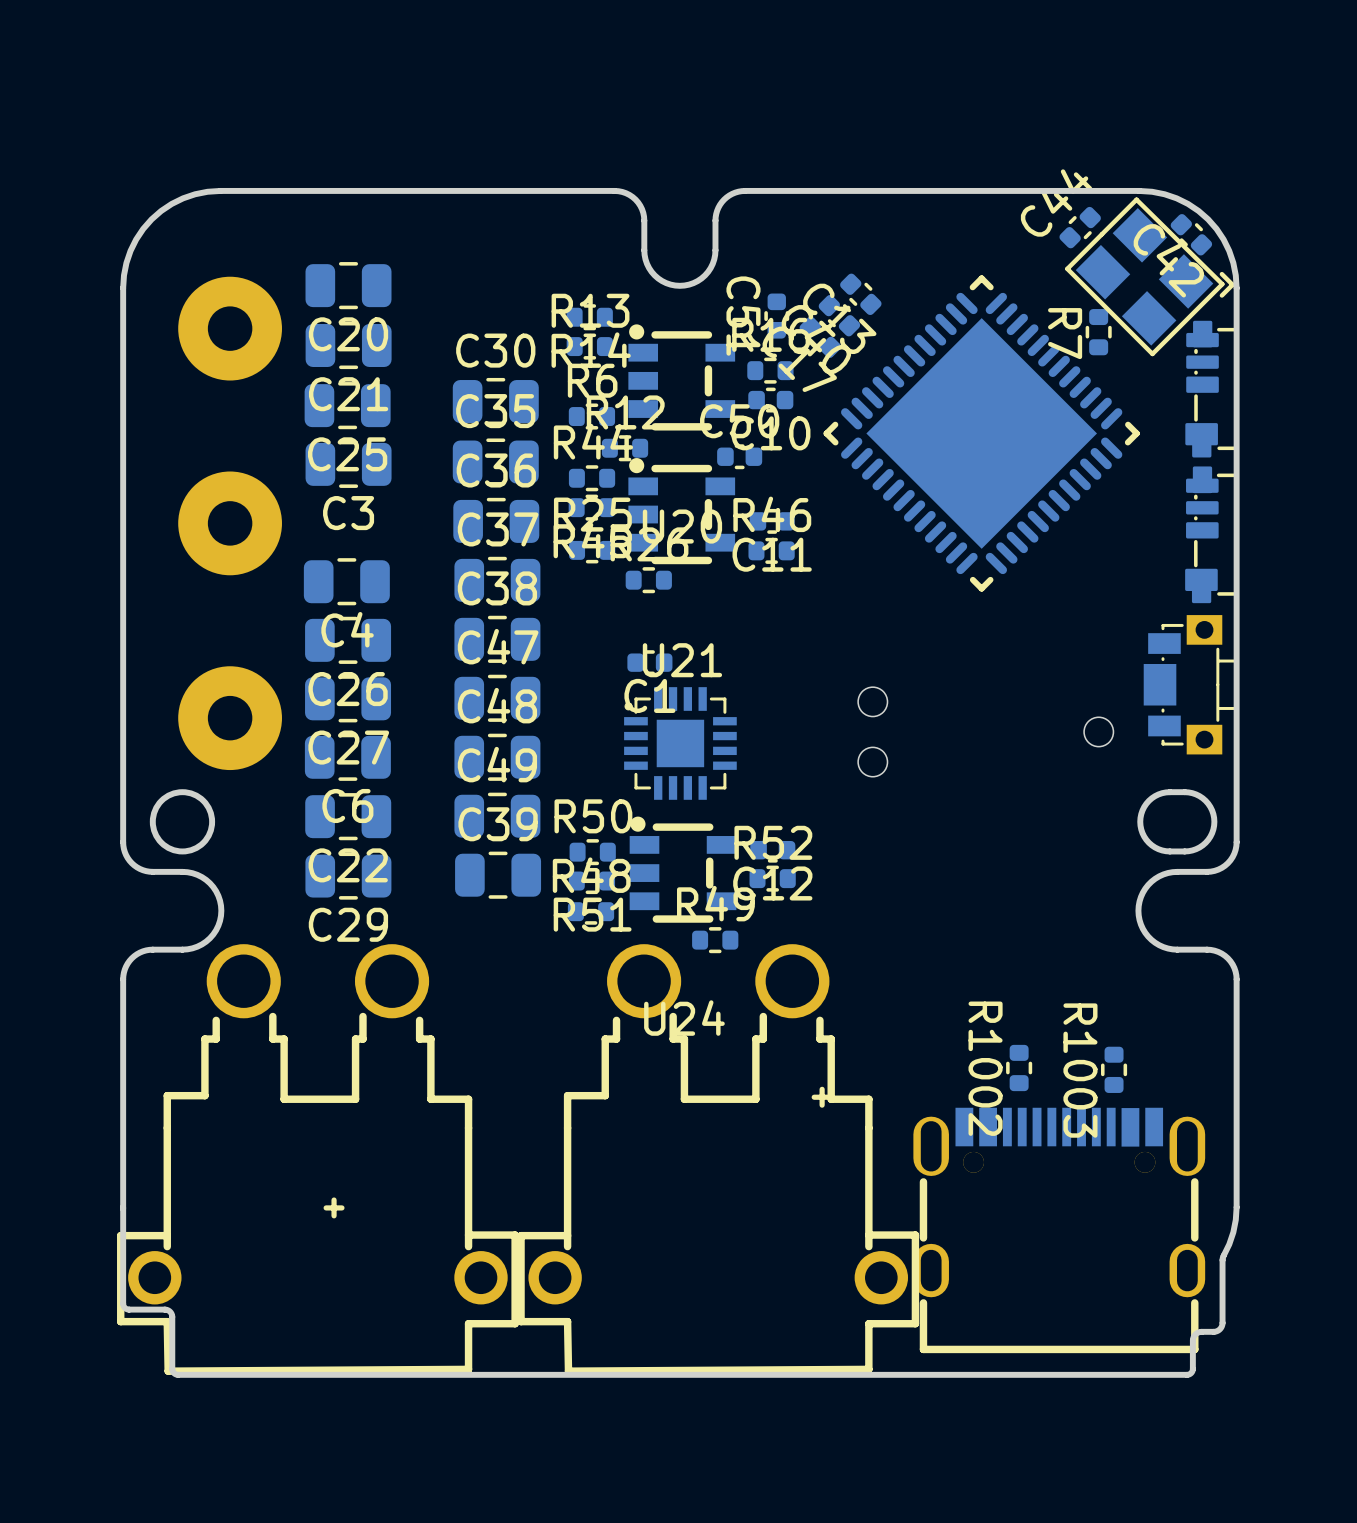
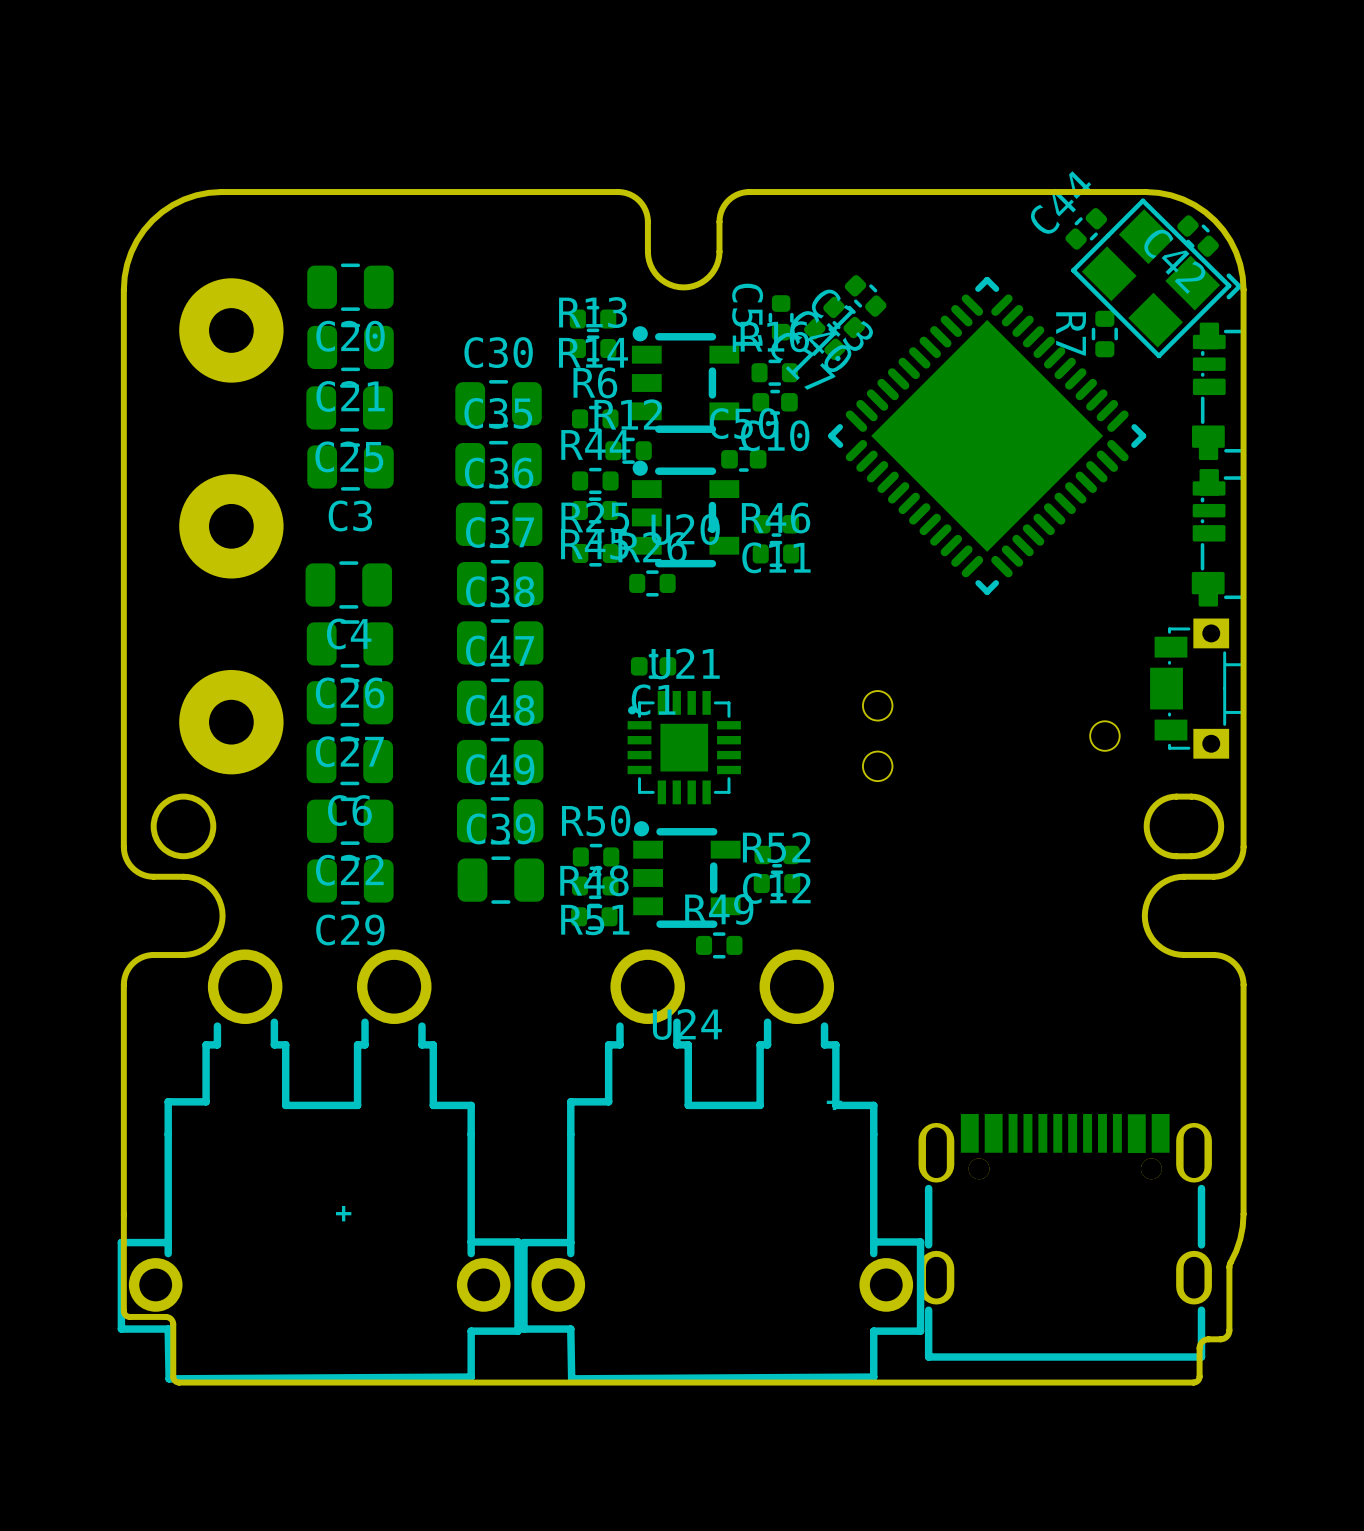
R1002: (1019, 1067) -> none
R1003: (1114, 1069) -> none

